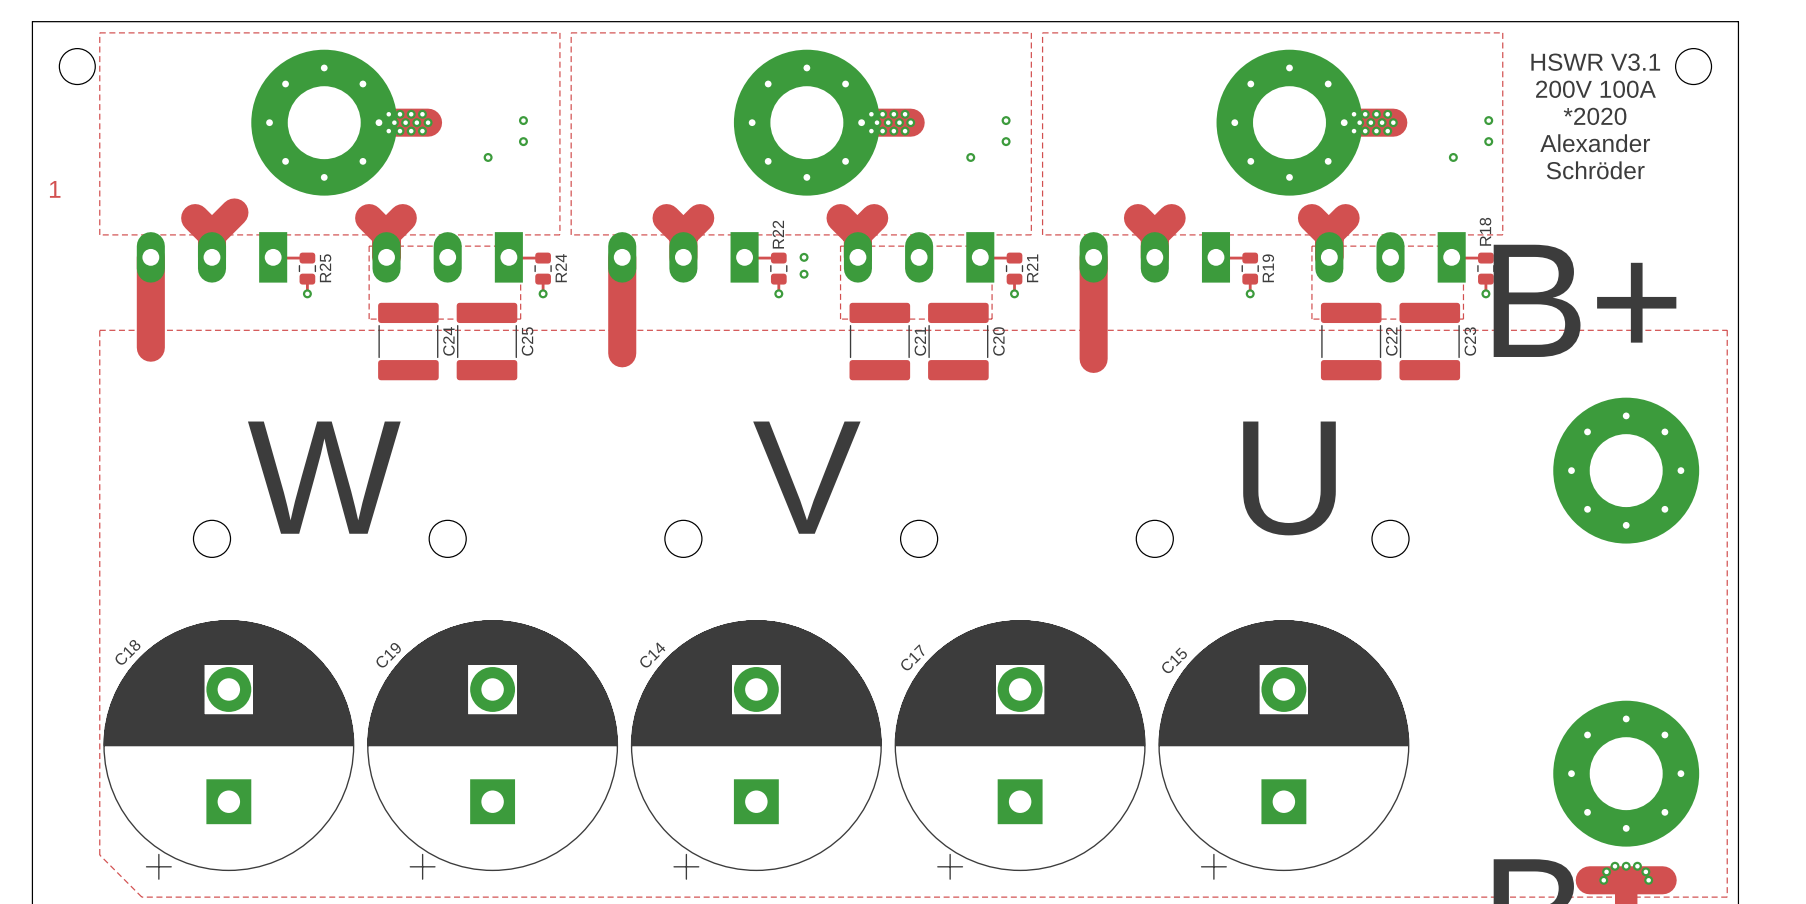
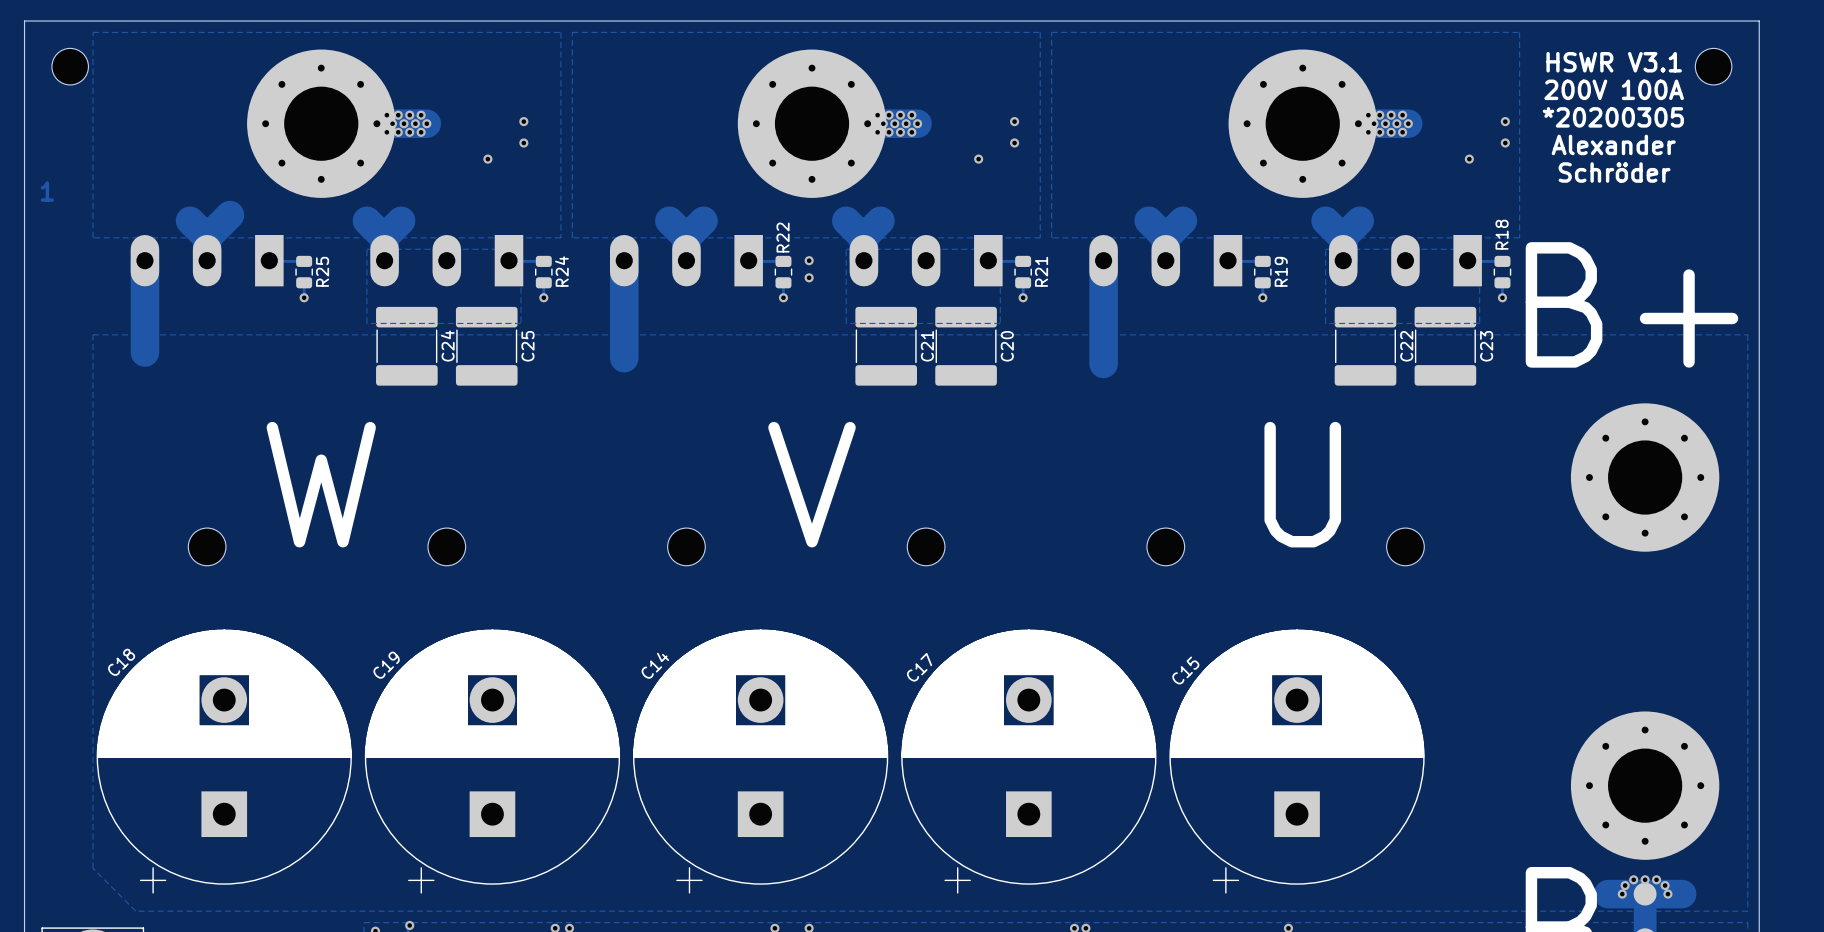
text: *2020 (1595, 116) -> *20200305 (1613, 117)

